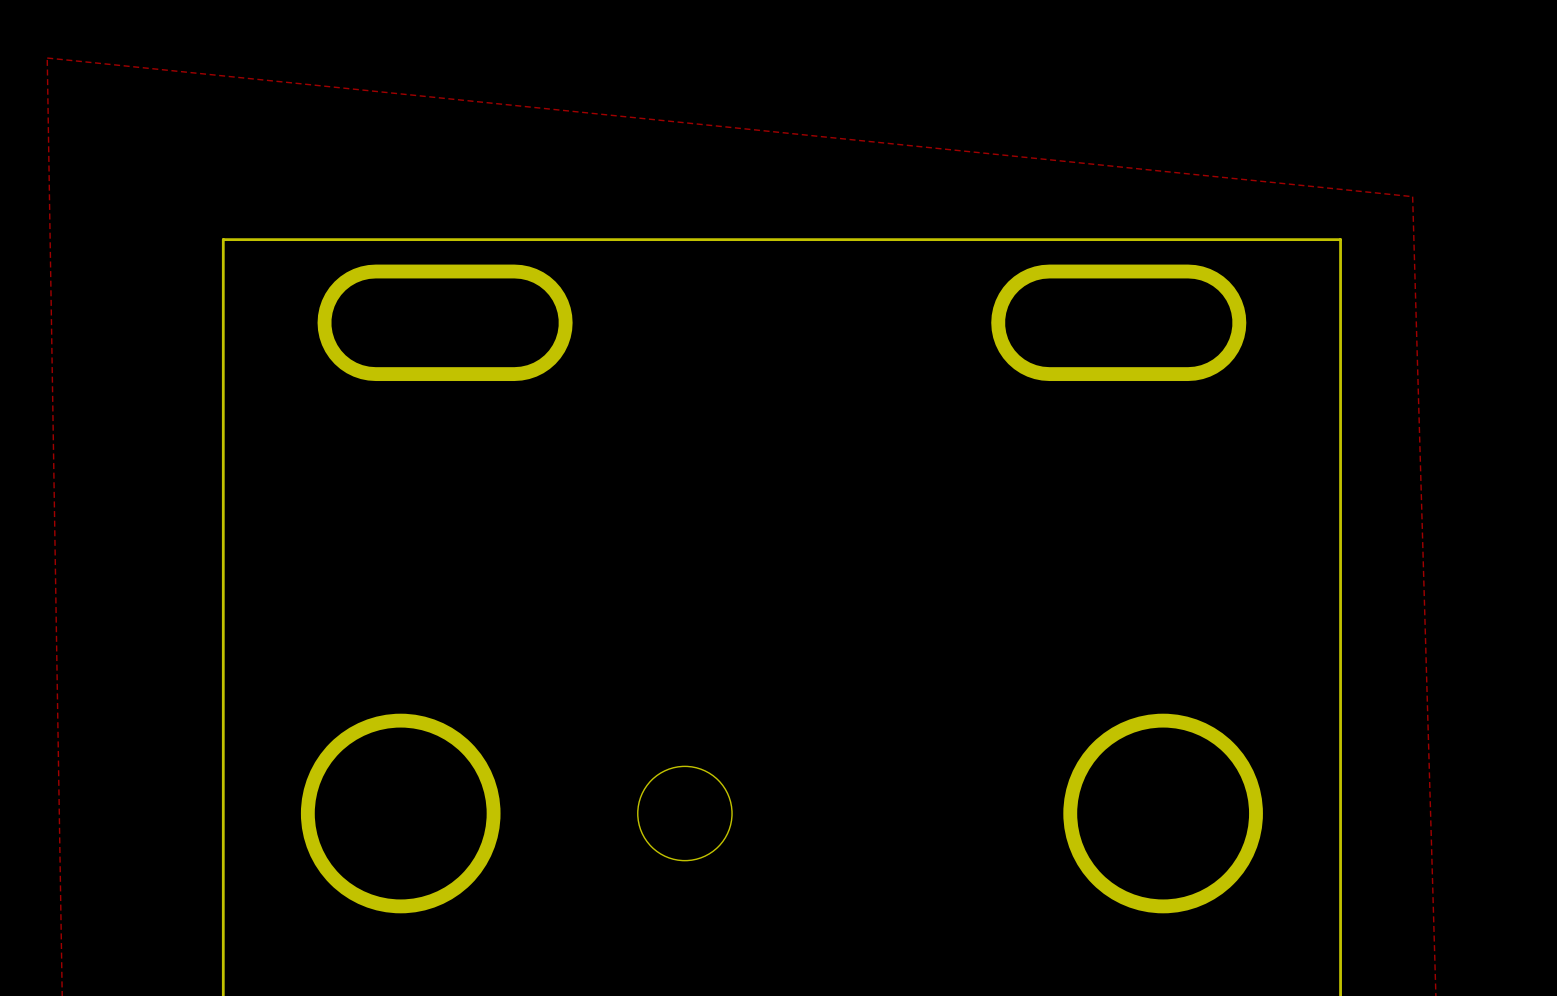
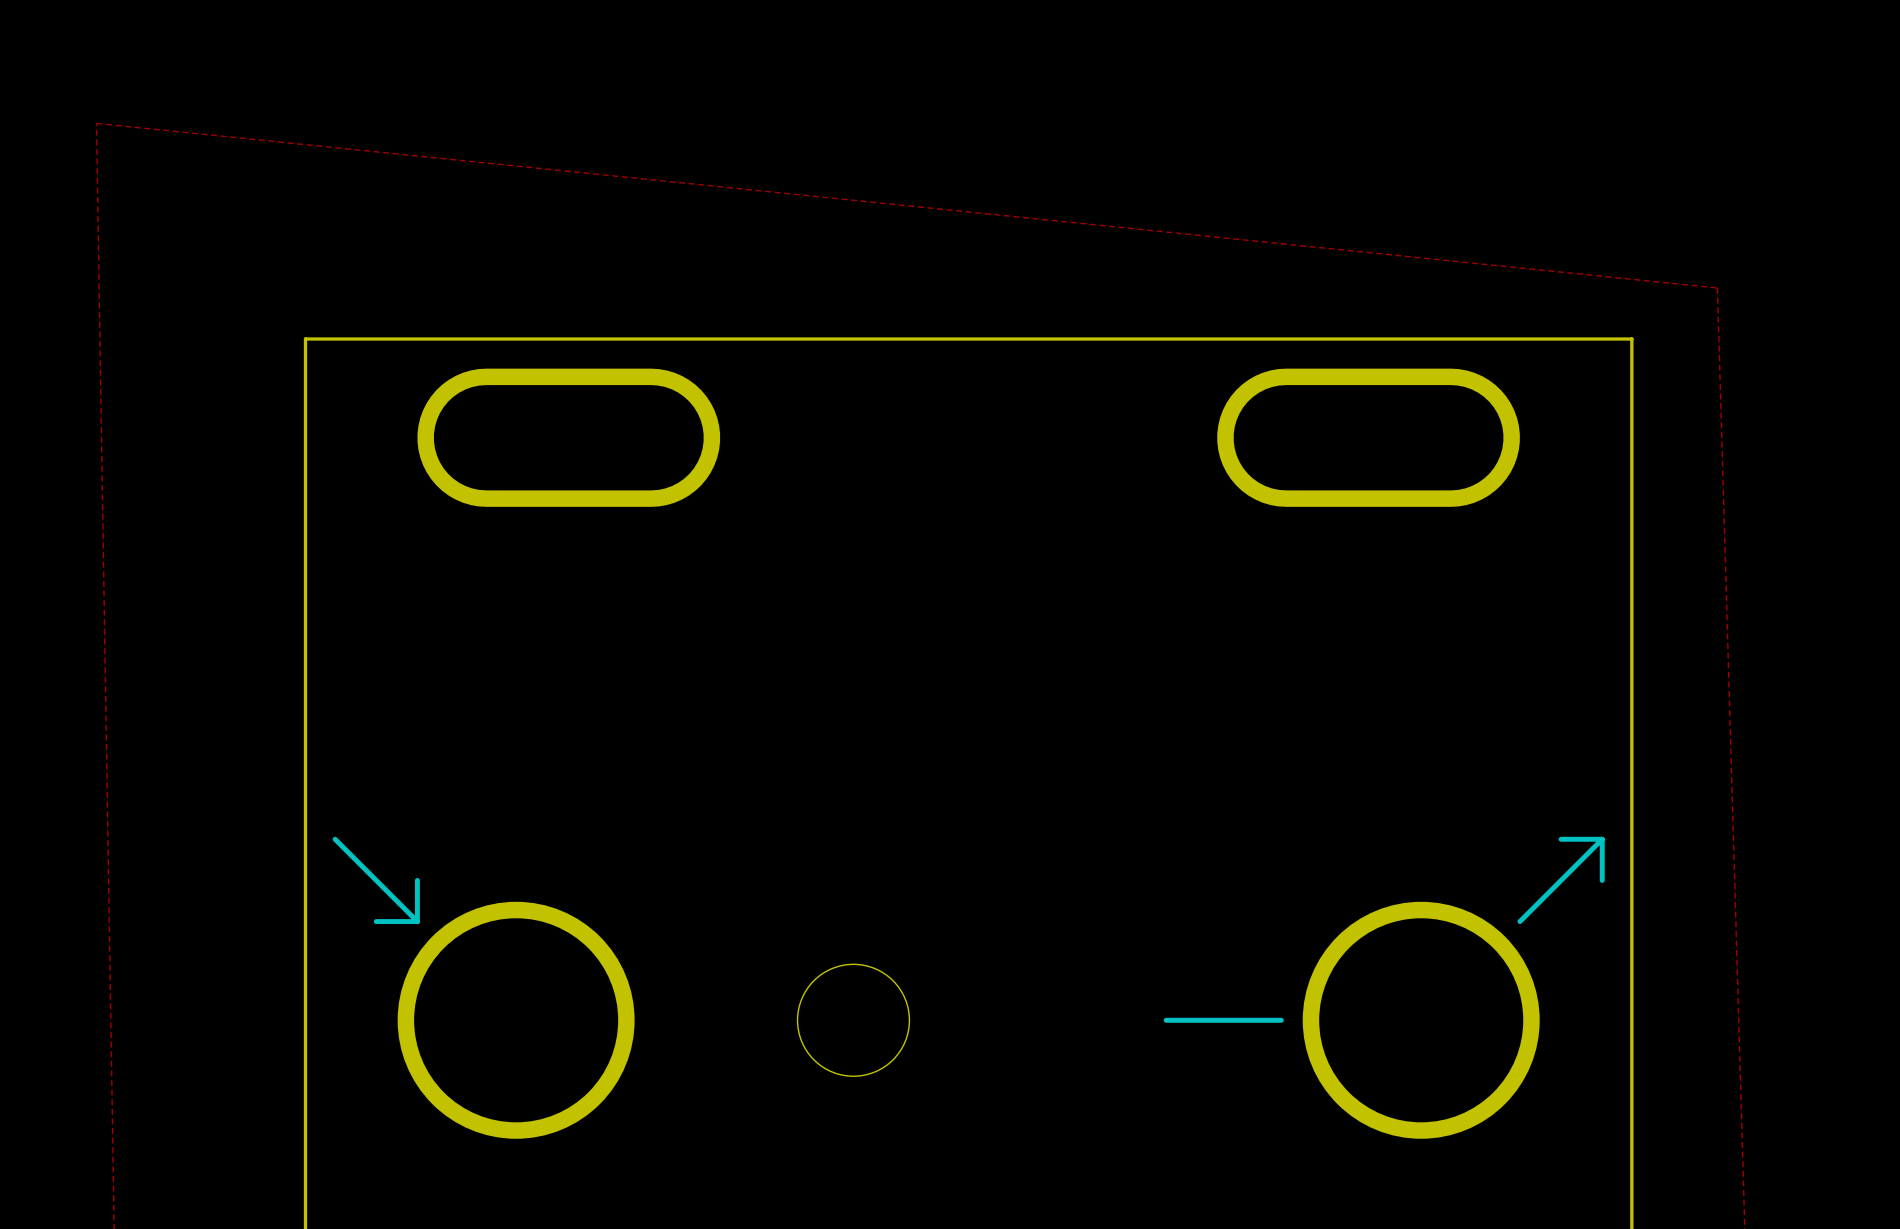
line: none -> (335, 839) (417, 921)
line: none -> (1561, 839) (1602, 839)
line: none -> (1602, 839) (1602, 880)
line: none -> (1602, 839) (1519, 921)
line: none -> (417, 880) (417, 921)
line: none -> (376, 921) (417, 921)
line: none -> (1166, 1020) (1281, 1020)

